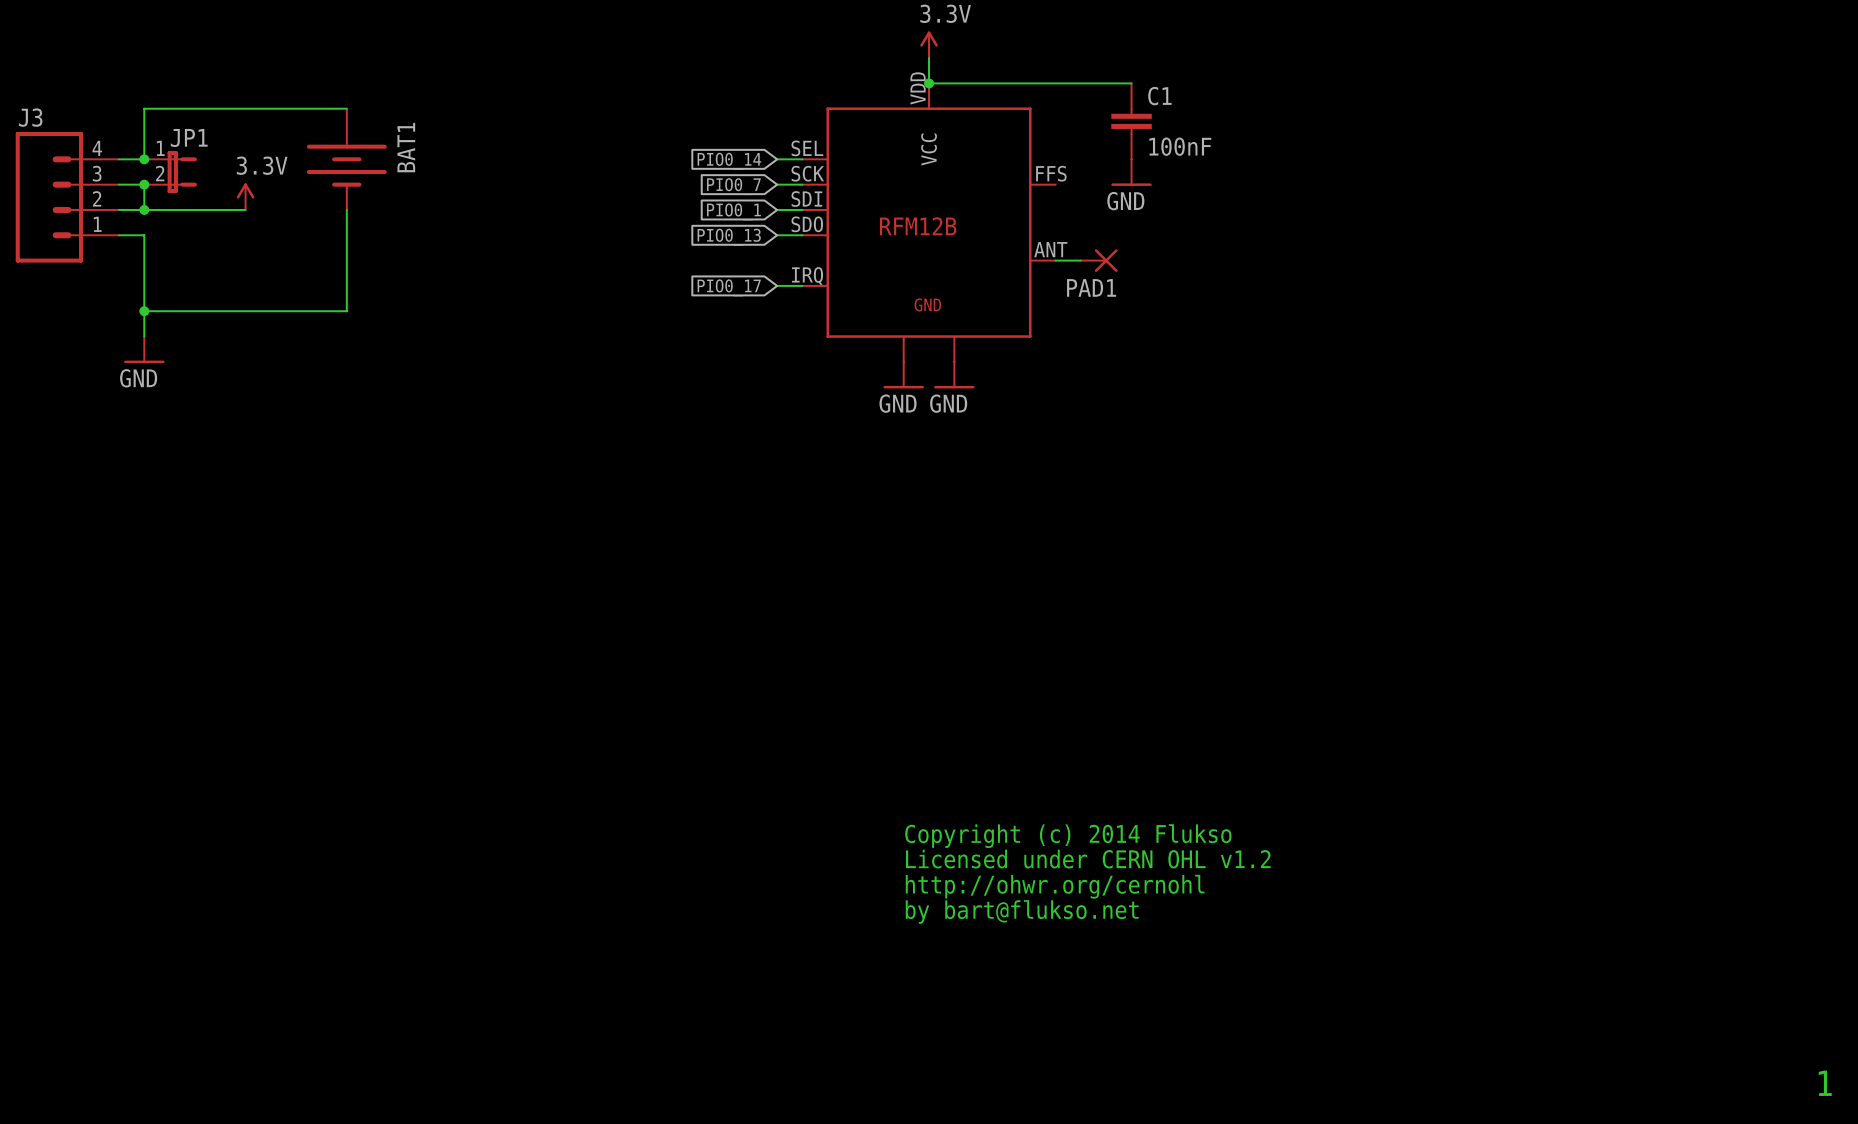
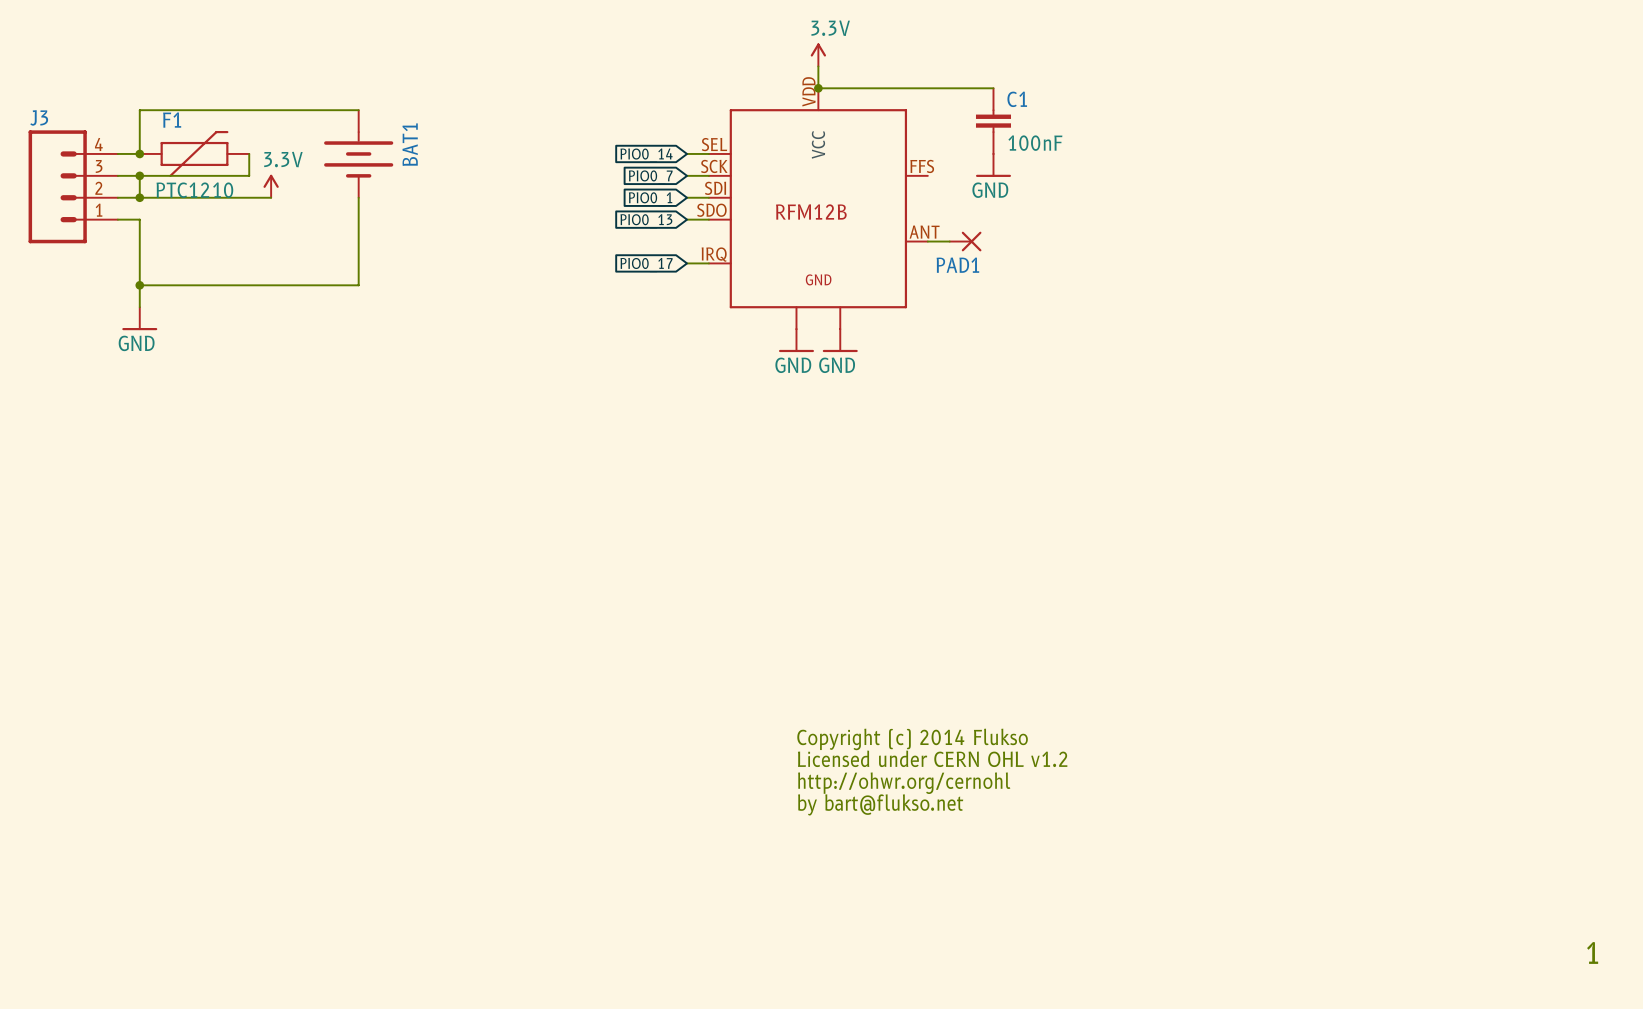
wire: none -> (314, 110) (358, 110)
F1: none -> PTC1210 (194, 153)
wire: none -> (249, 153) (249, 175) (139, 175)
BAT1 position: (346, 159) -> (358, 153)
JP1: (170, 172) -> none
power symbol position: 3.3V (245, 196) -> 3.3V (271, 186)
wire: none -> (227, 197) (271, 197)
wire: (346, 209) (346, 311) -> (358, 197) (358, 285) (314, 285)

